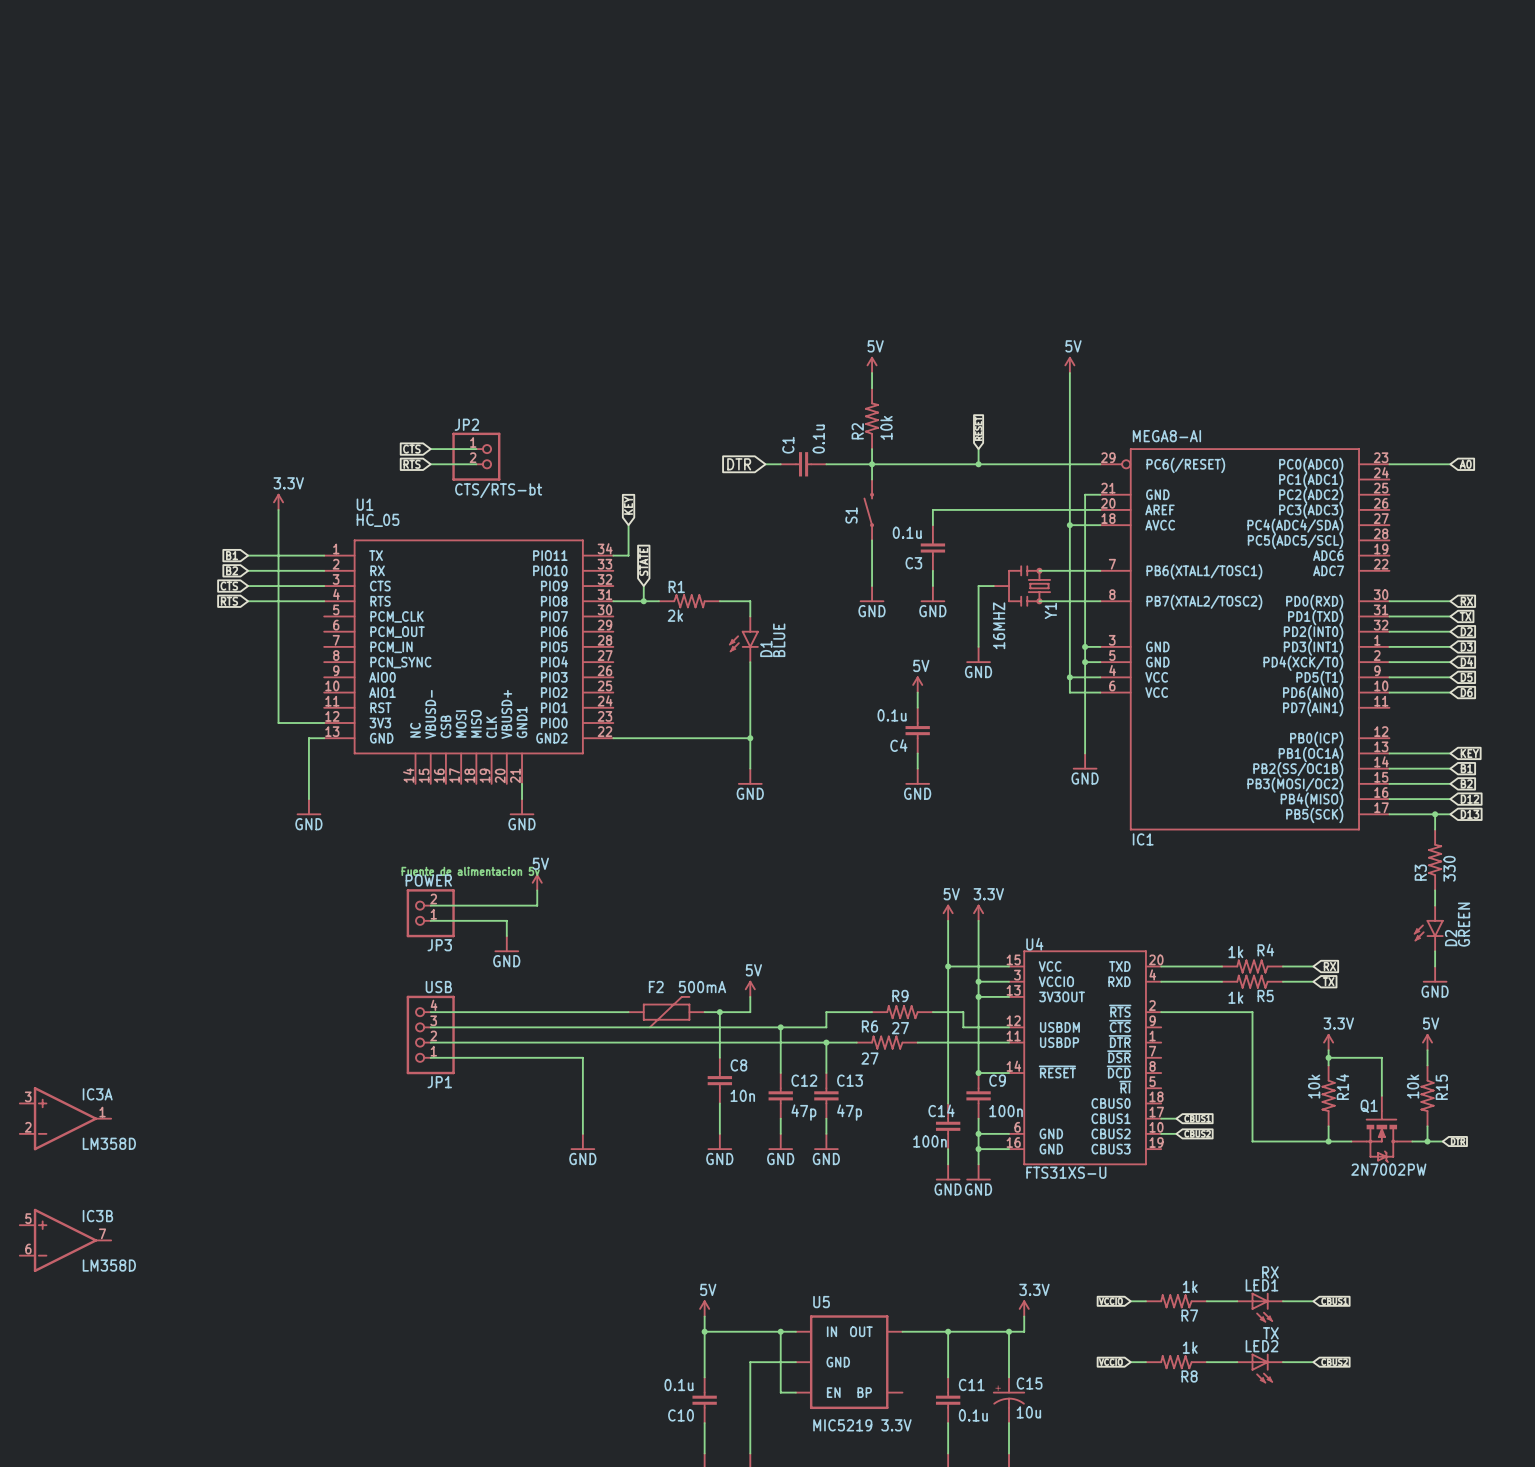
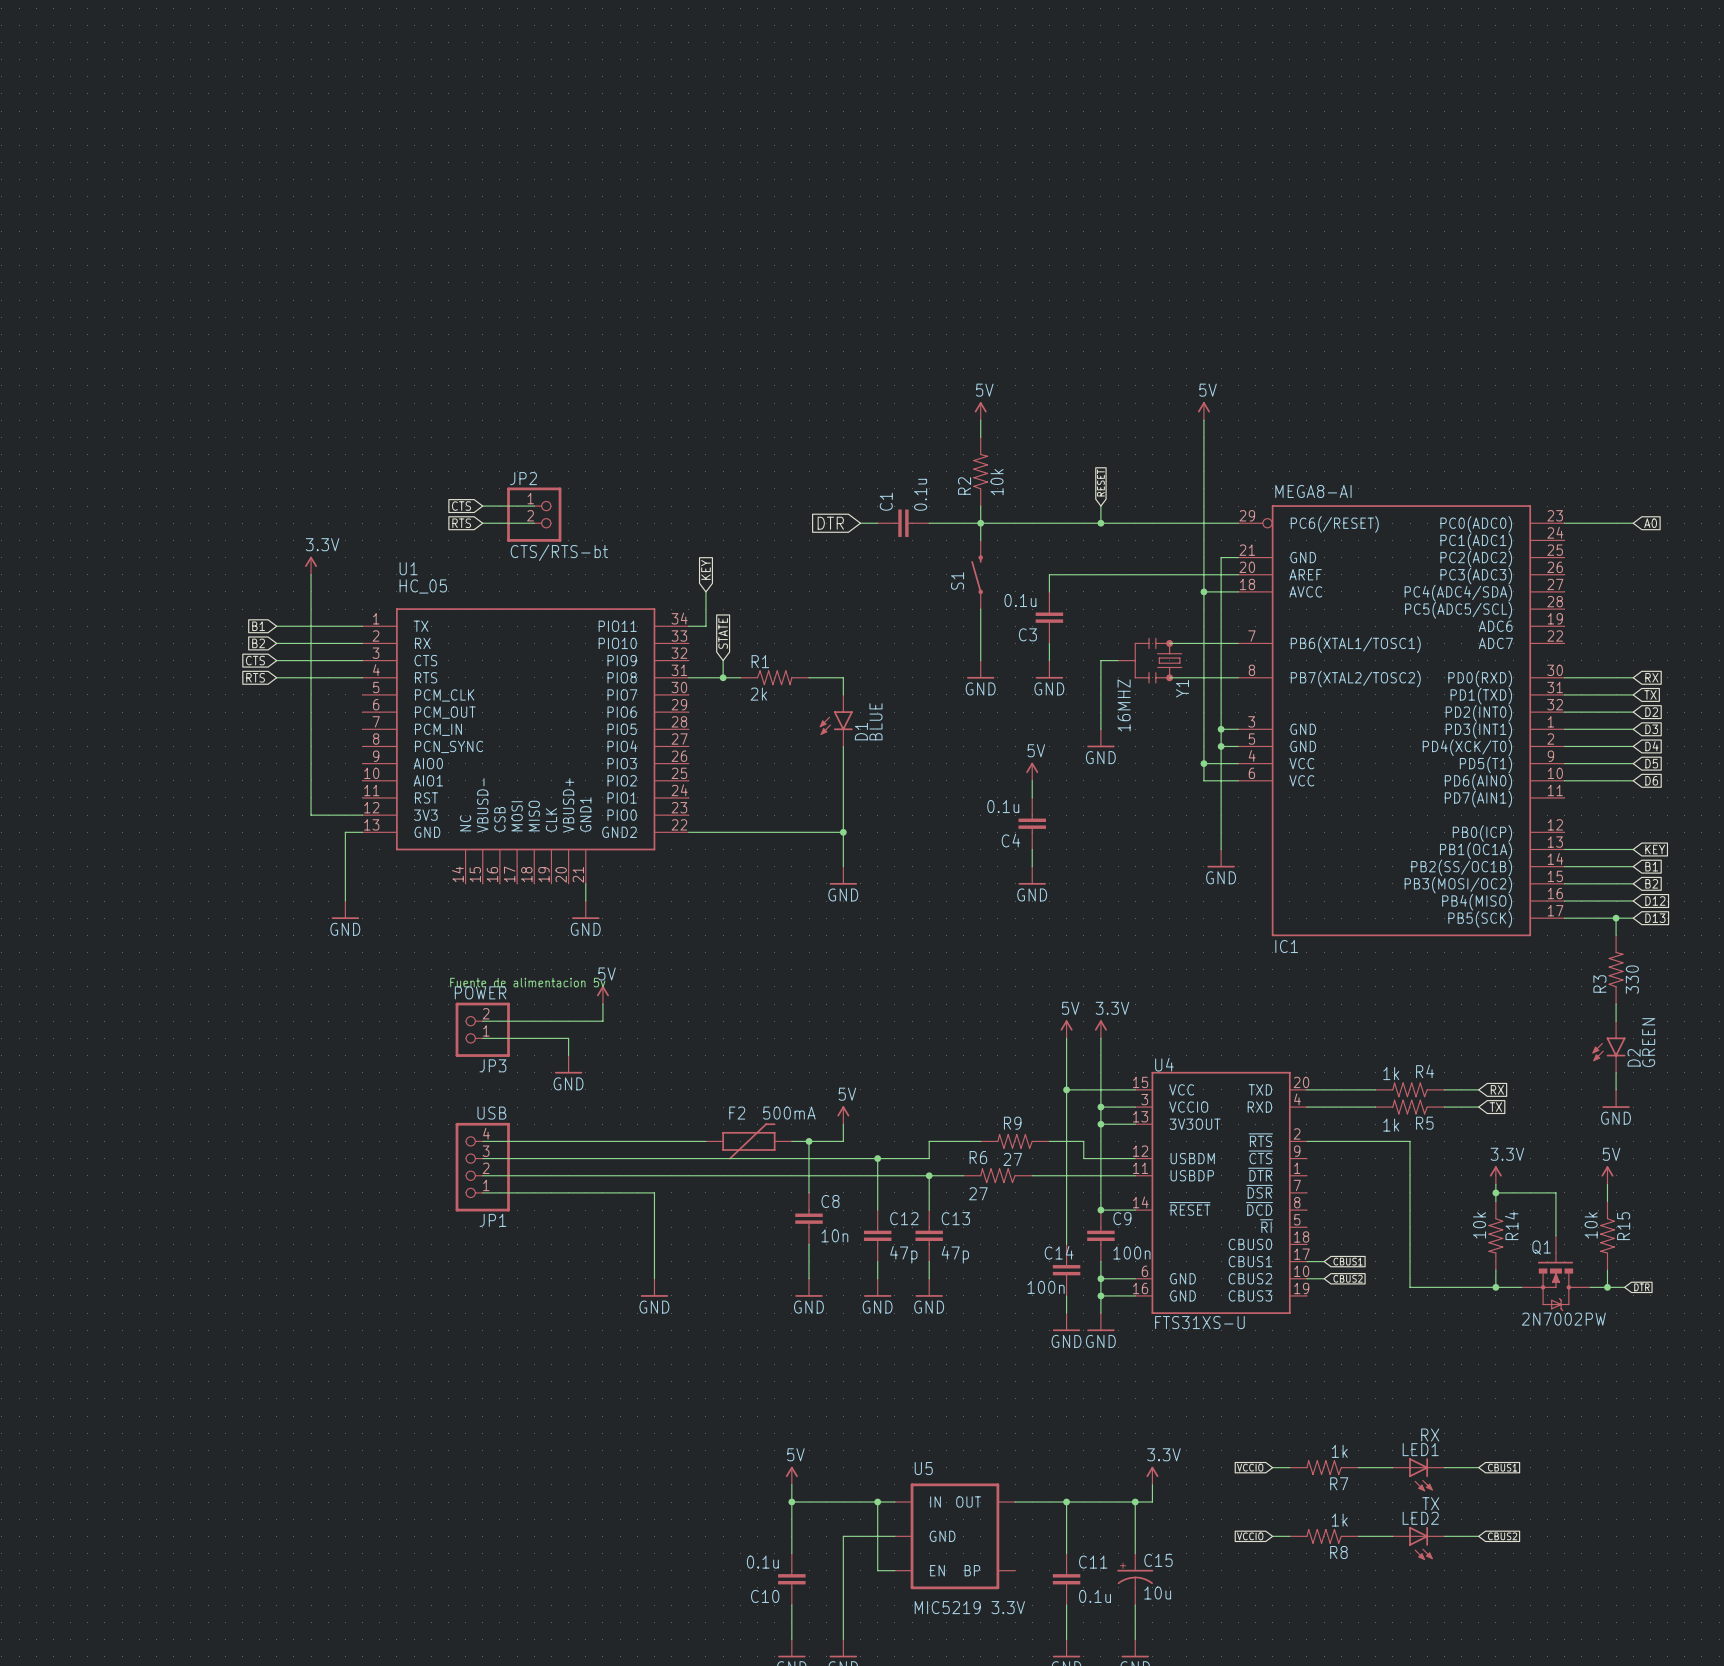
IC3A: LM358D (65, 1118) -> none
IC3B: LM358D (65, 1240) -> none

